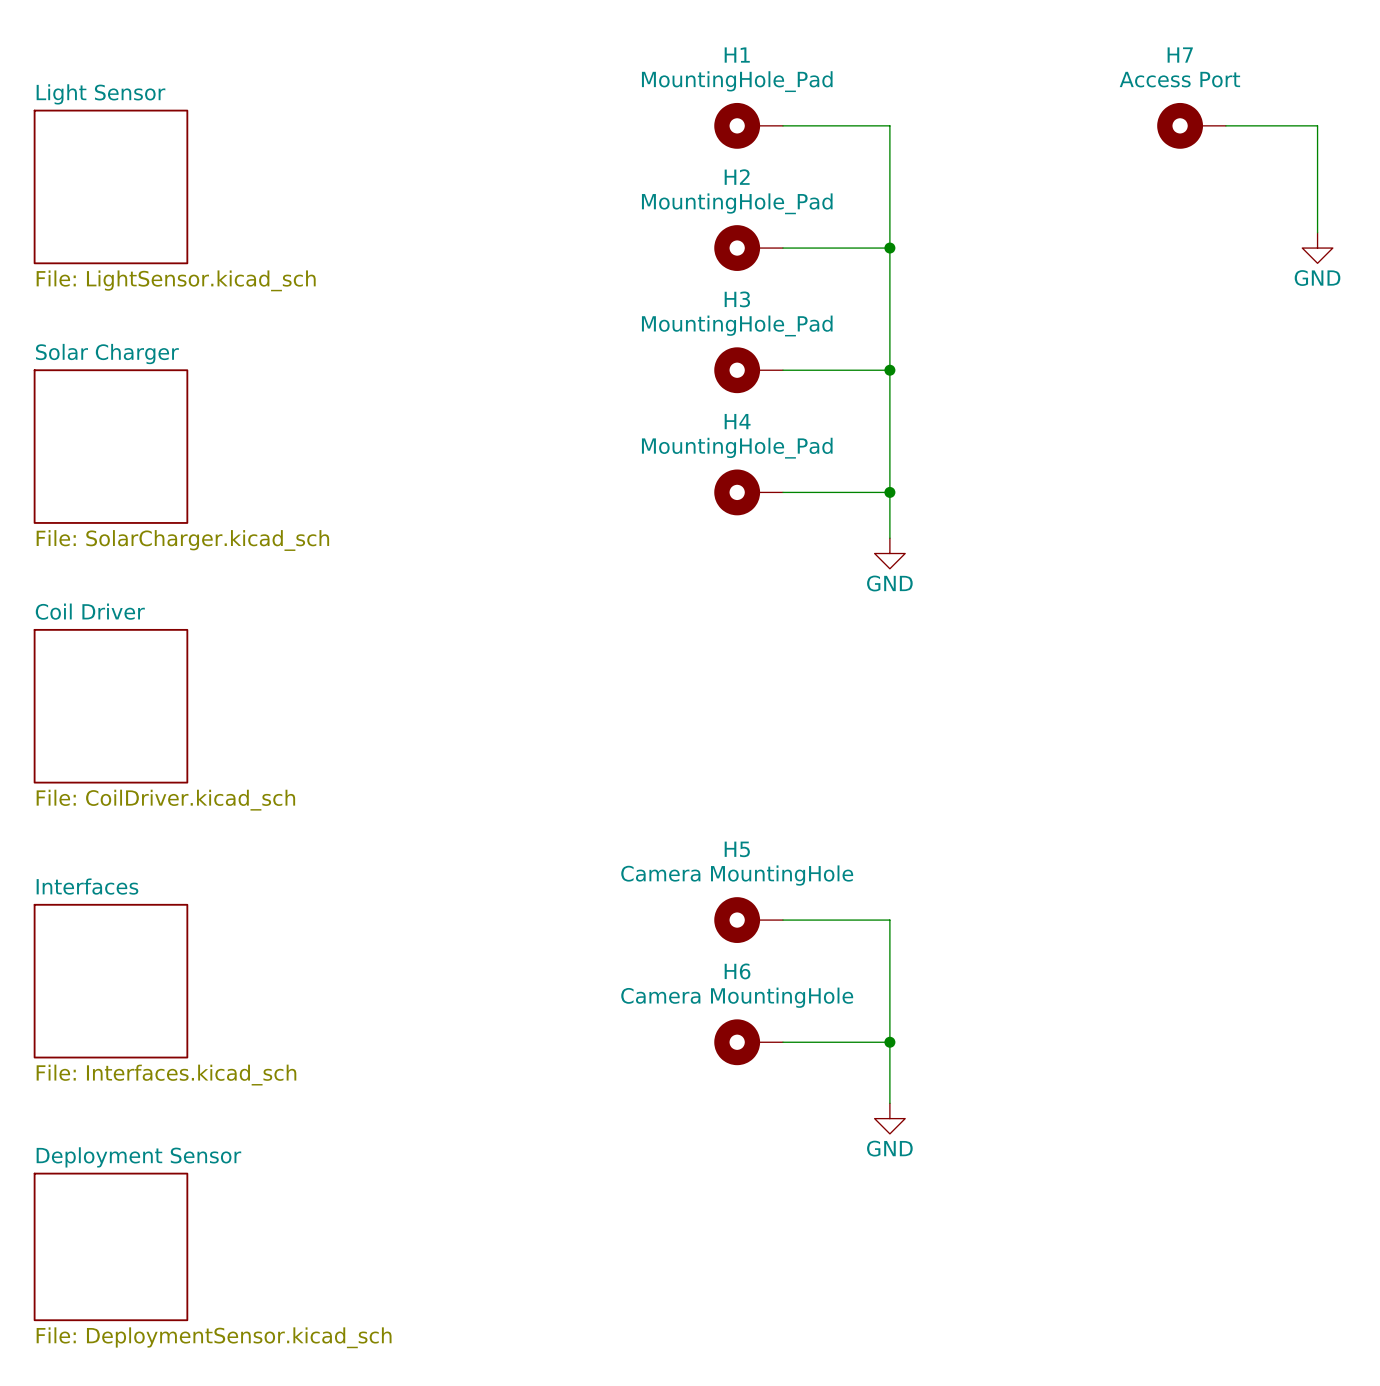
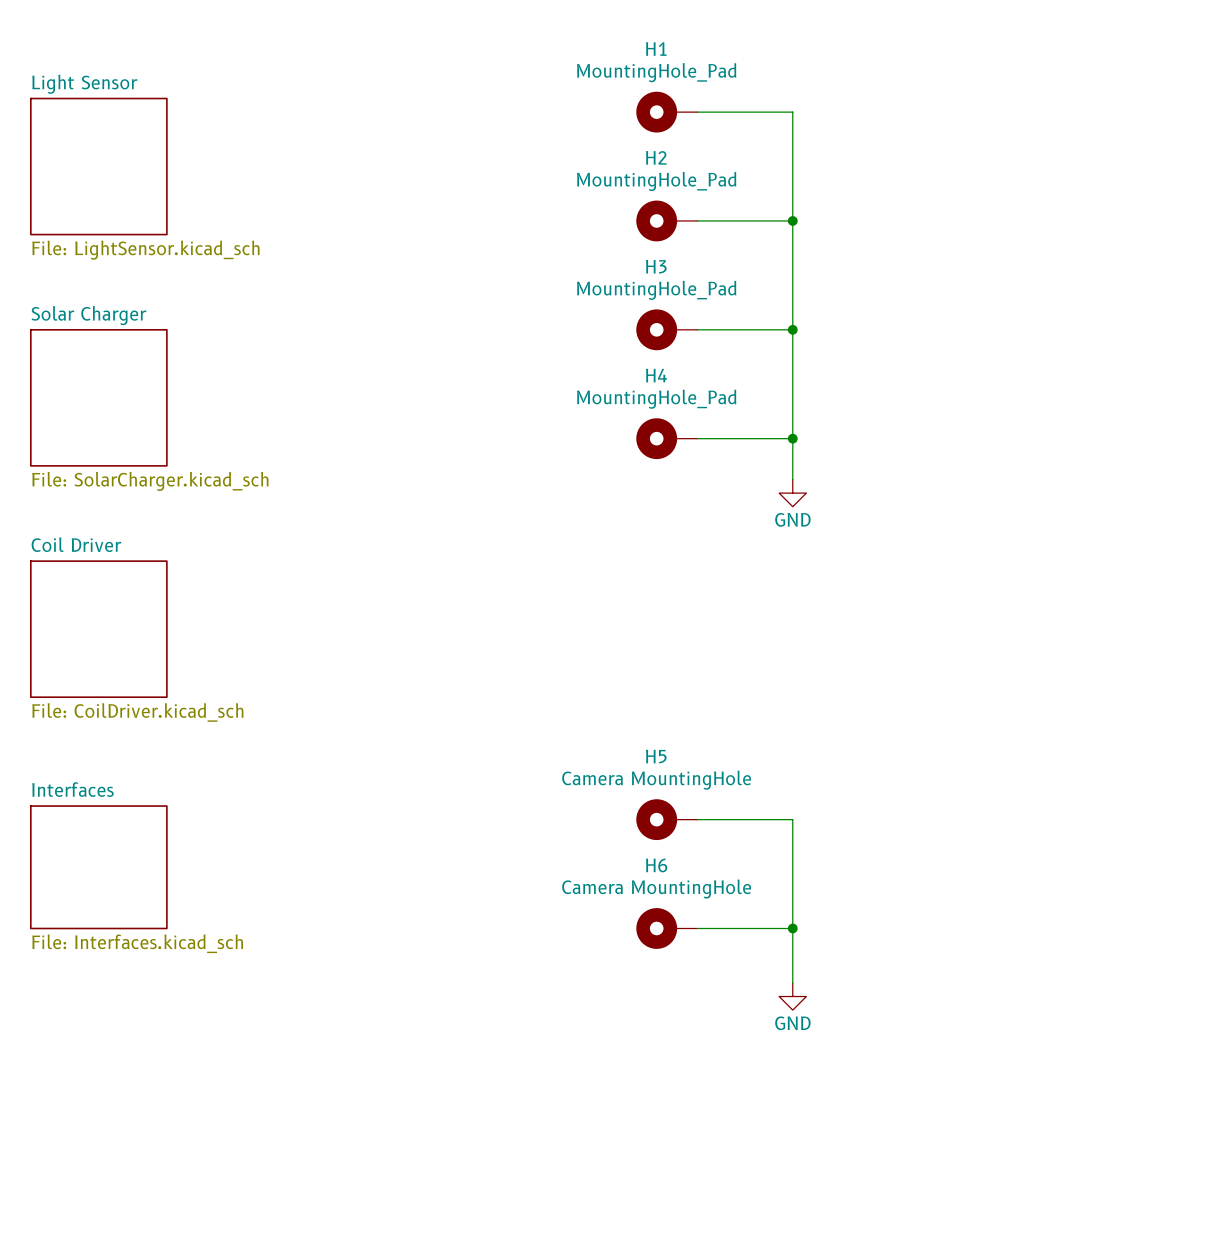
H7: Access Port (1191, 125) -> none
wire: (1225, 125) (1317, 125) (1317, 232) -> none
power symbol: GND (1317, 248) -> none
sheet Interfaces shape: [33, 903, 189, 1059] -> [30, 805, 168, 930]
sheet Deployment Sensor: File: DeploymentSensor.kicad_sch (110, 1246) -> none

